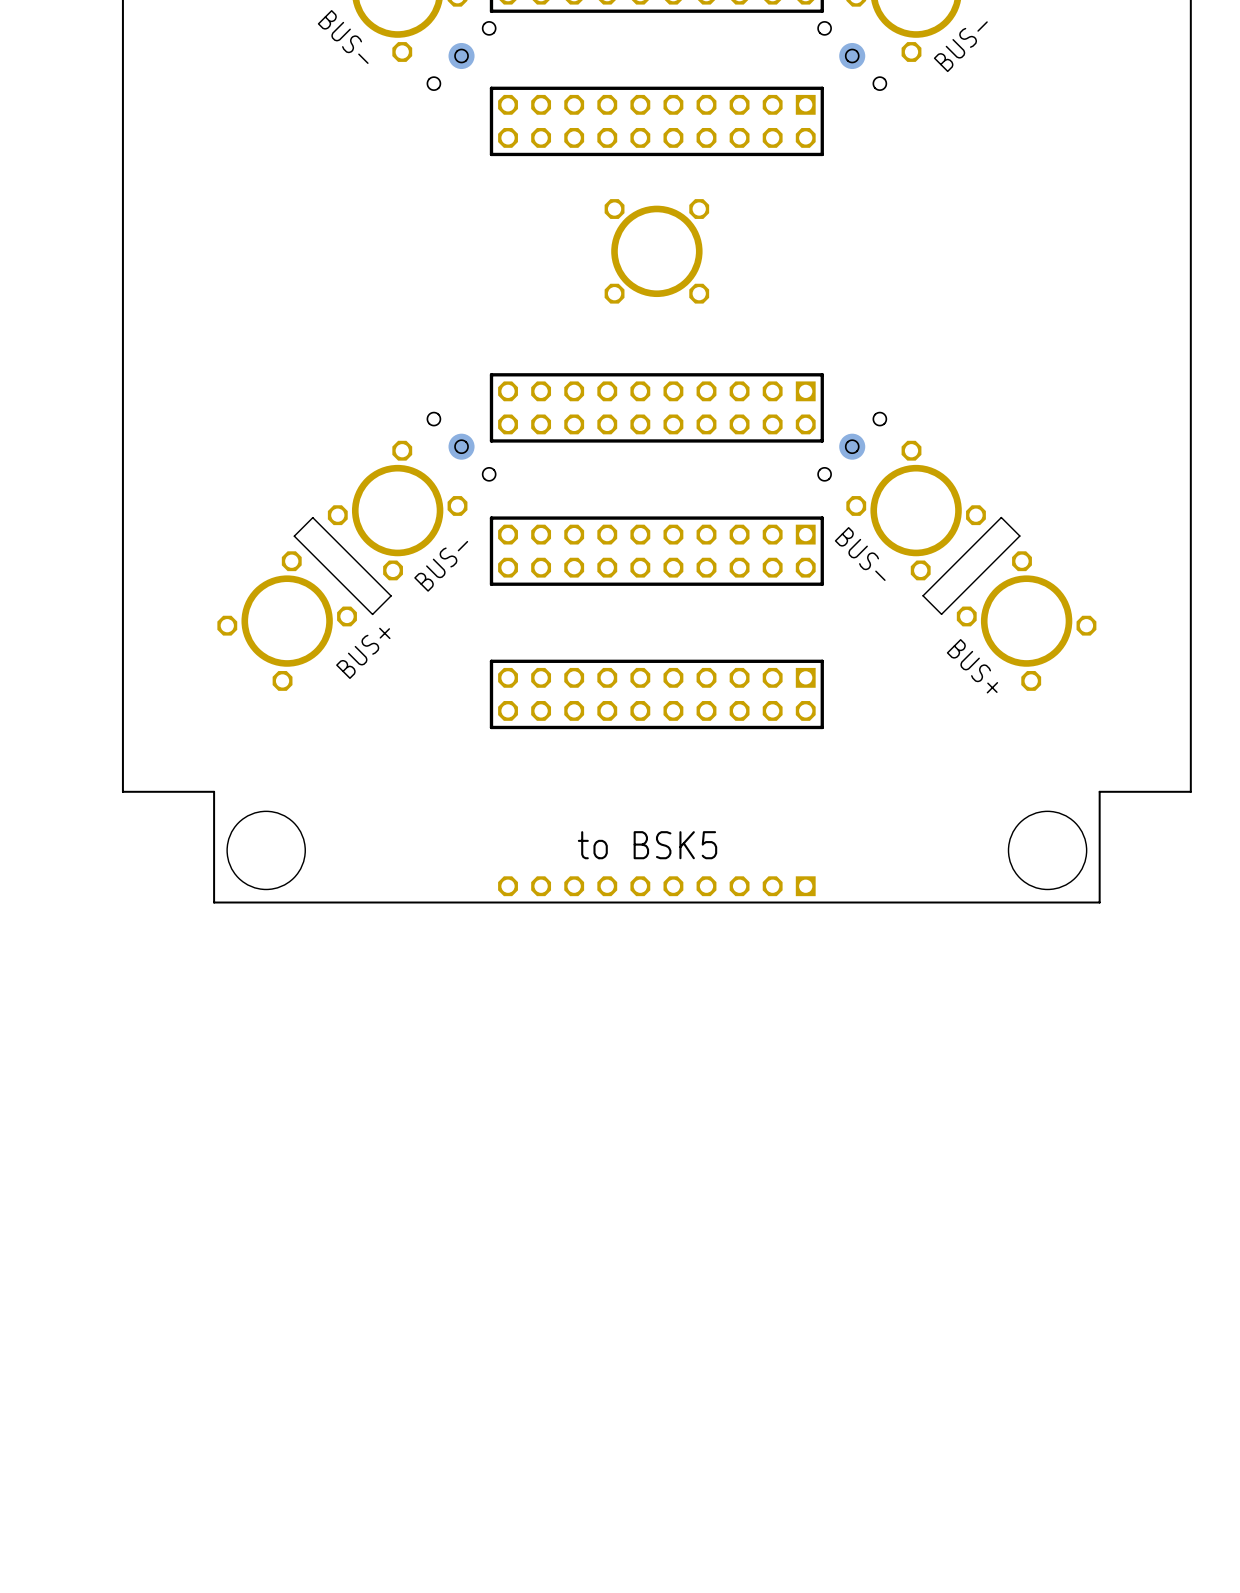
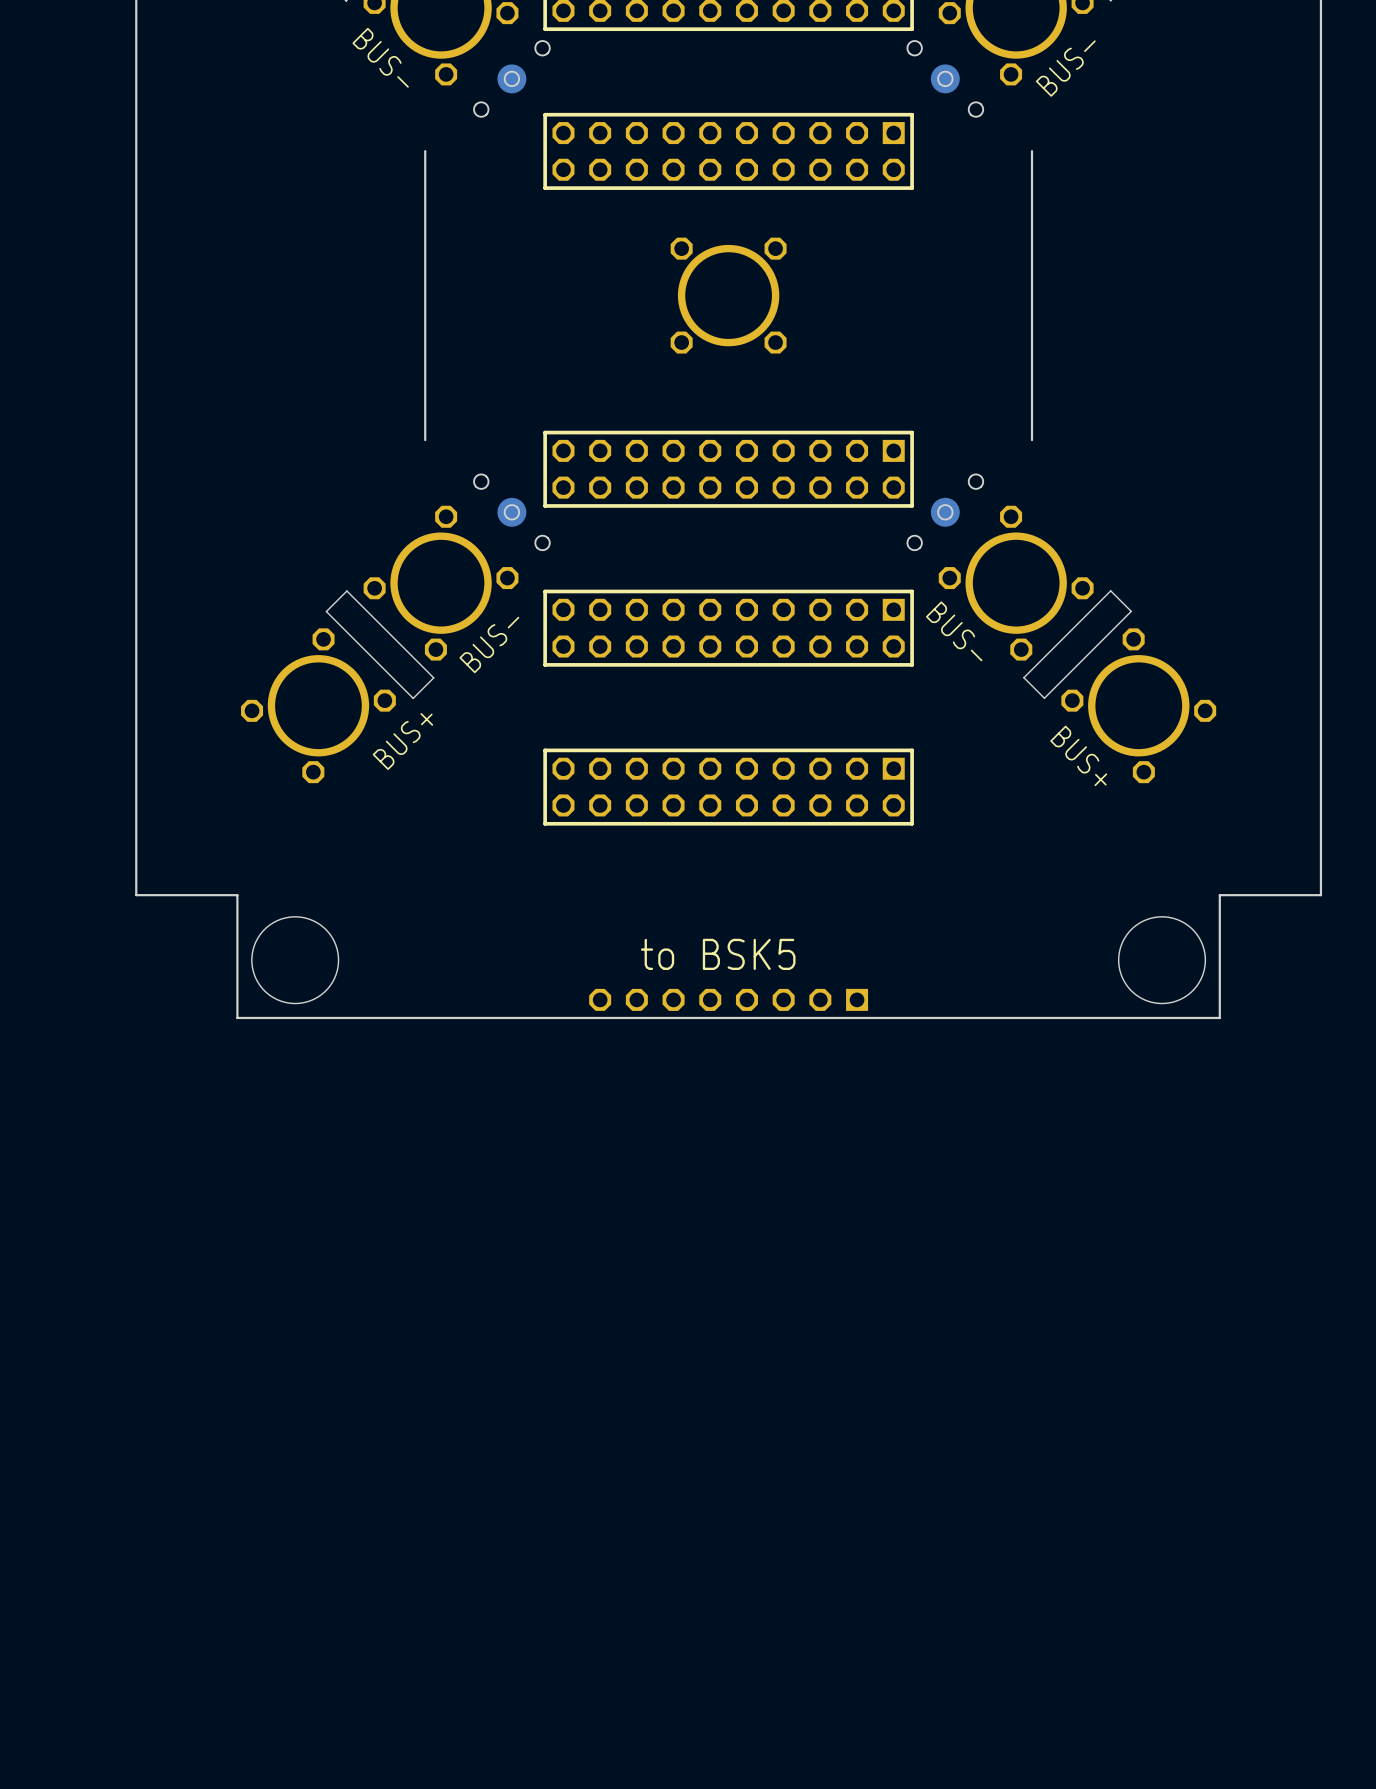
board edge: none -> (425, 151) (425, 440)
board edge: none -> (1032, 151) (1032, 440)
part footprint: [498, 876, 816, 897] -> [589, 988, 869, 1011]

